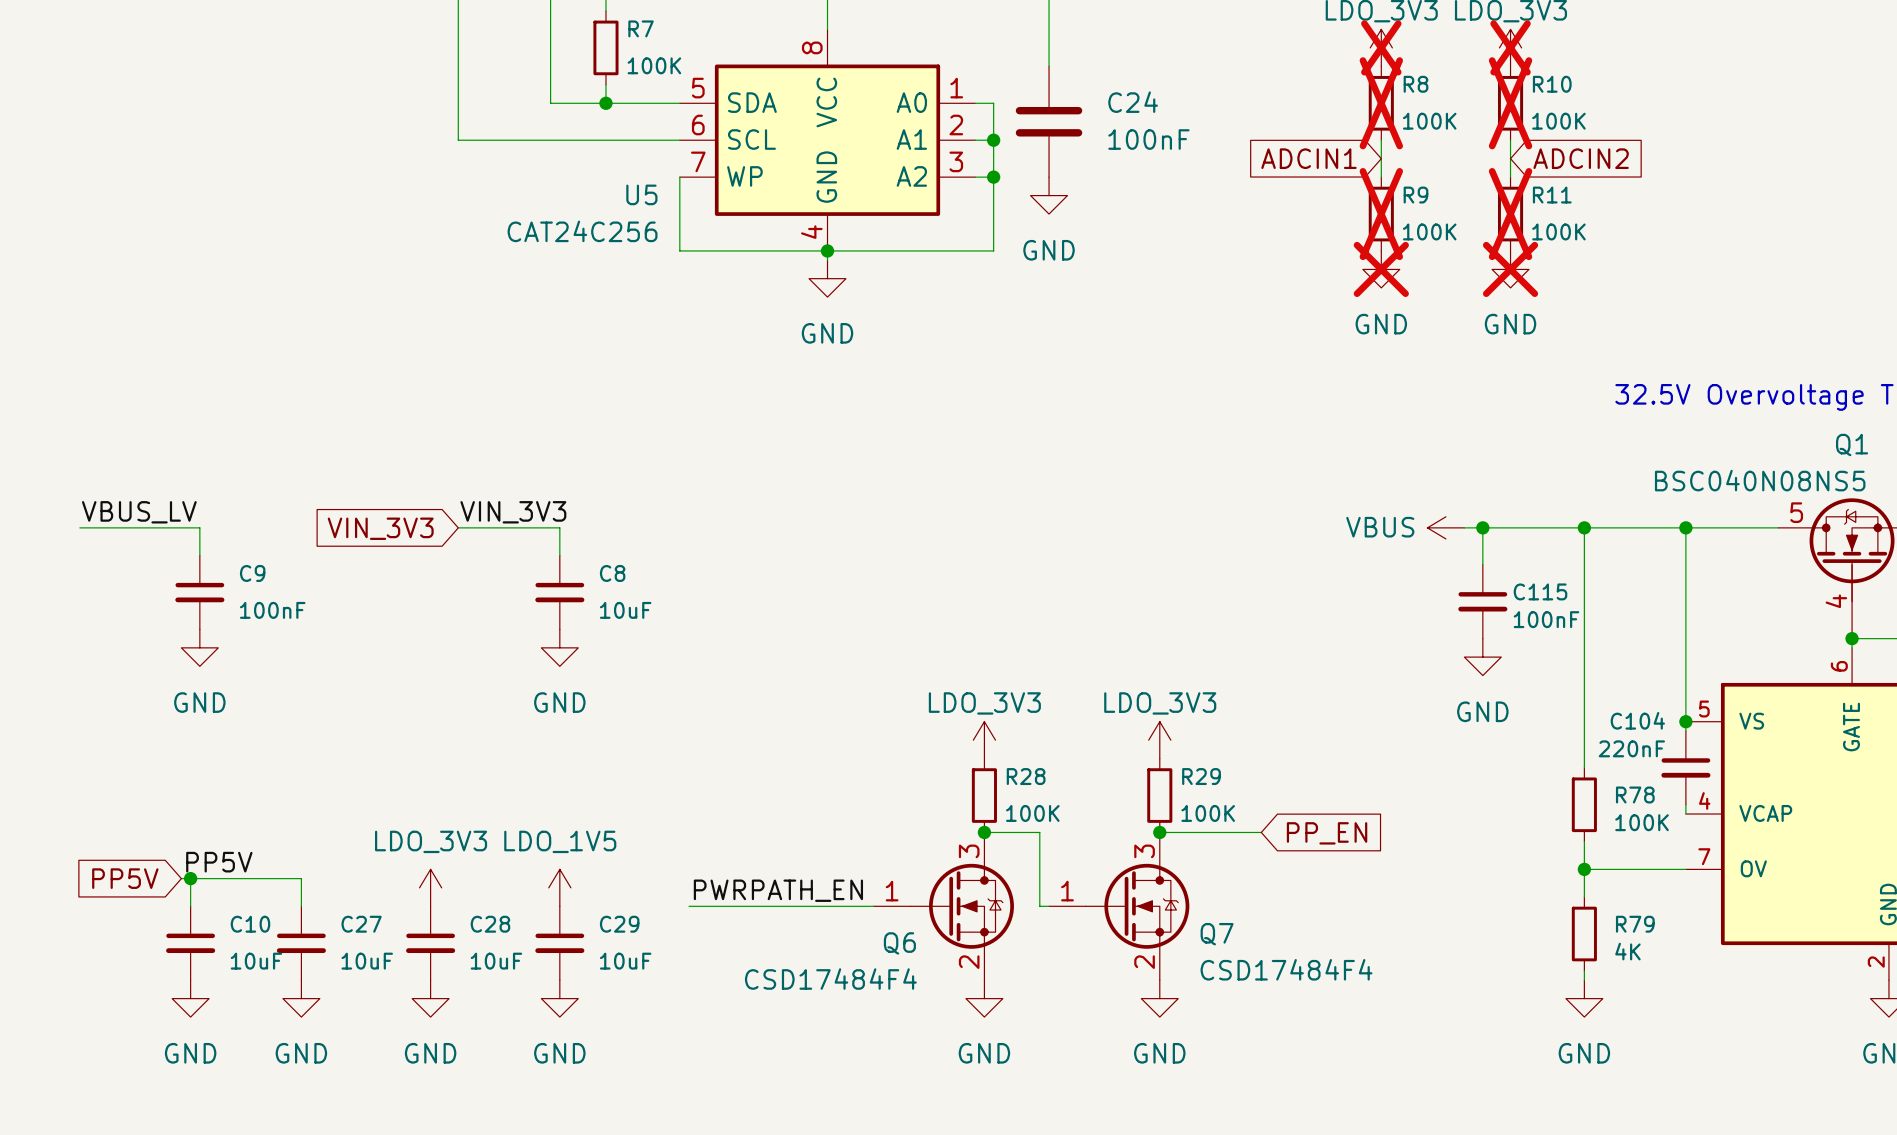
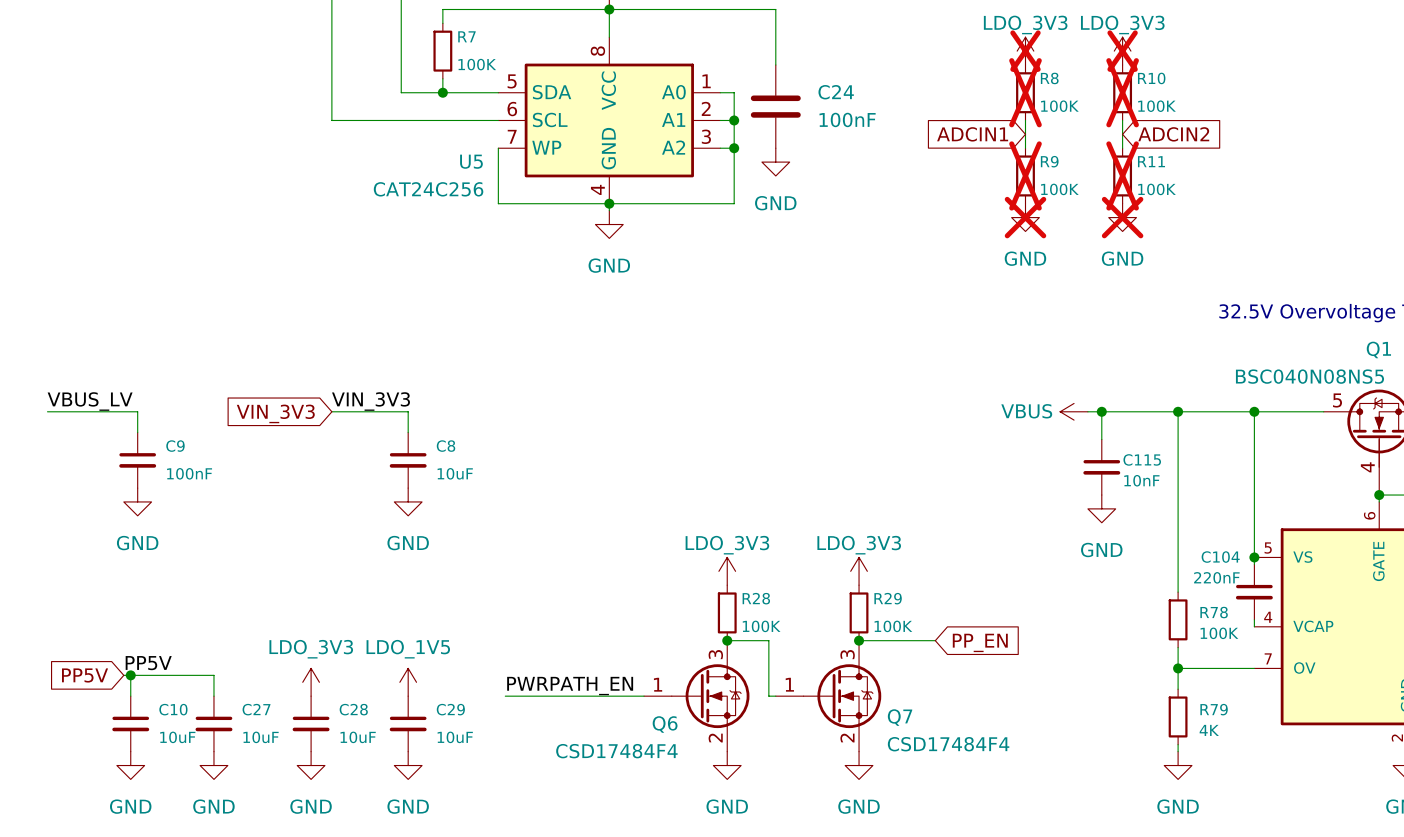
C115 value: 100nF (1546, 619) -> 10nF (1141, 480)

